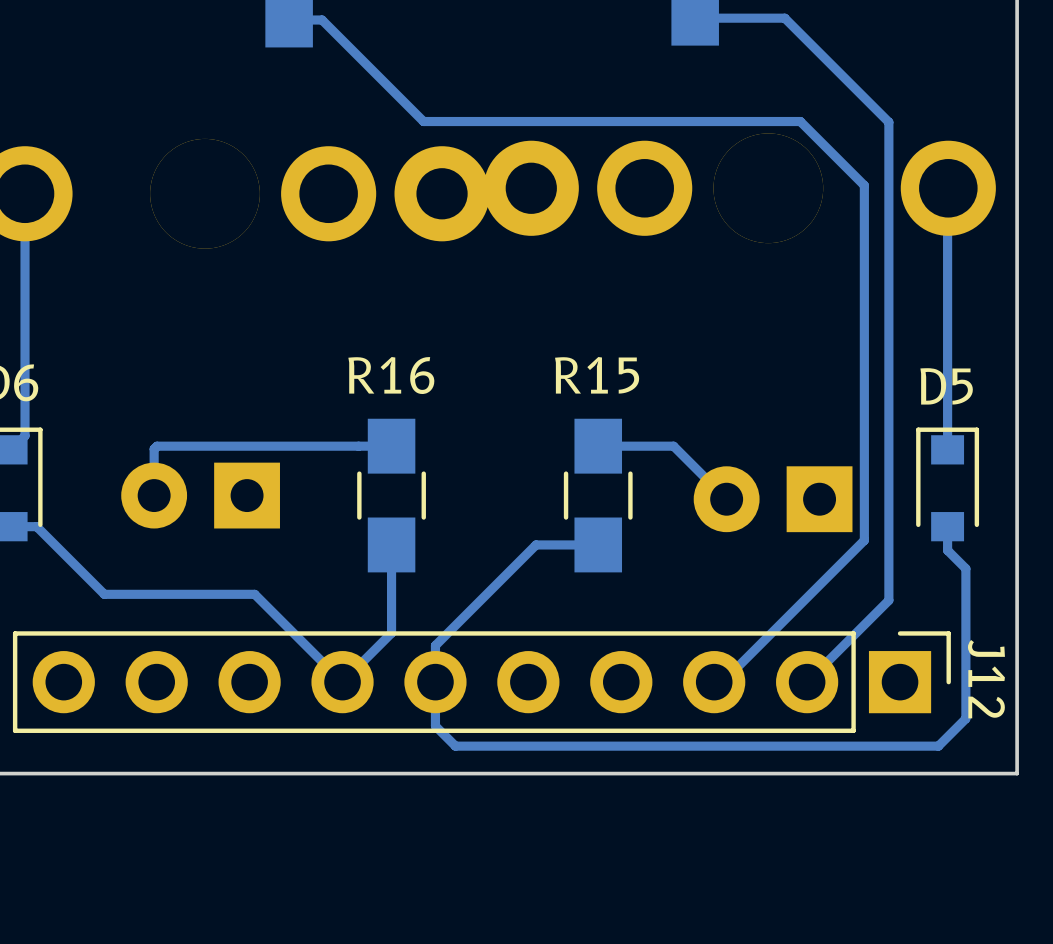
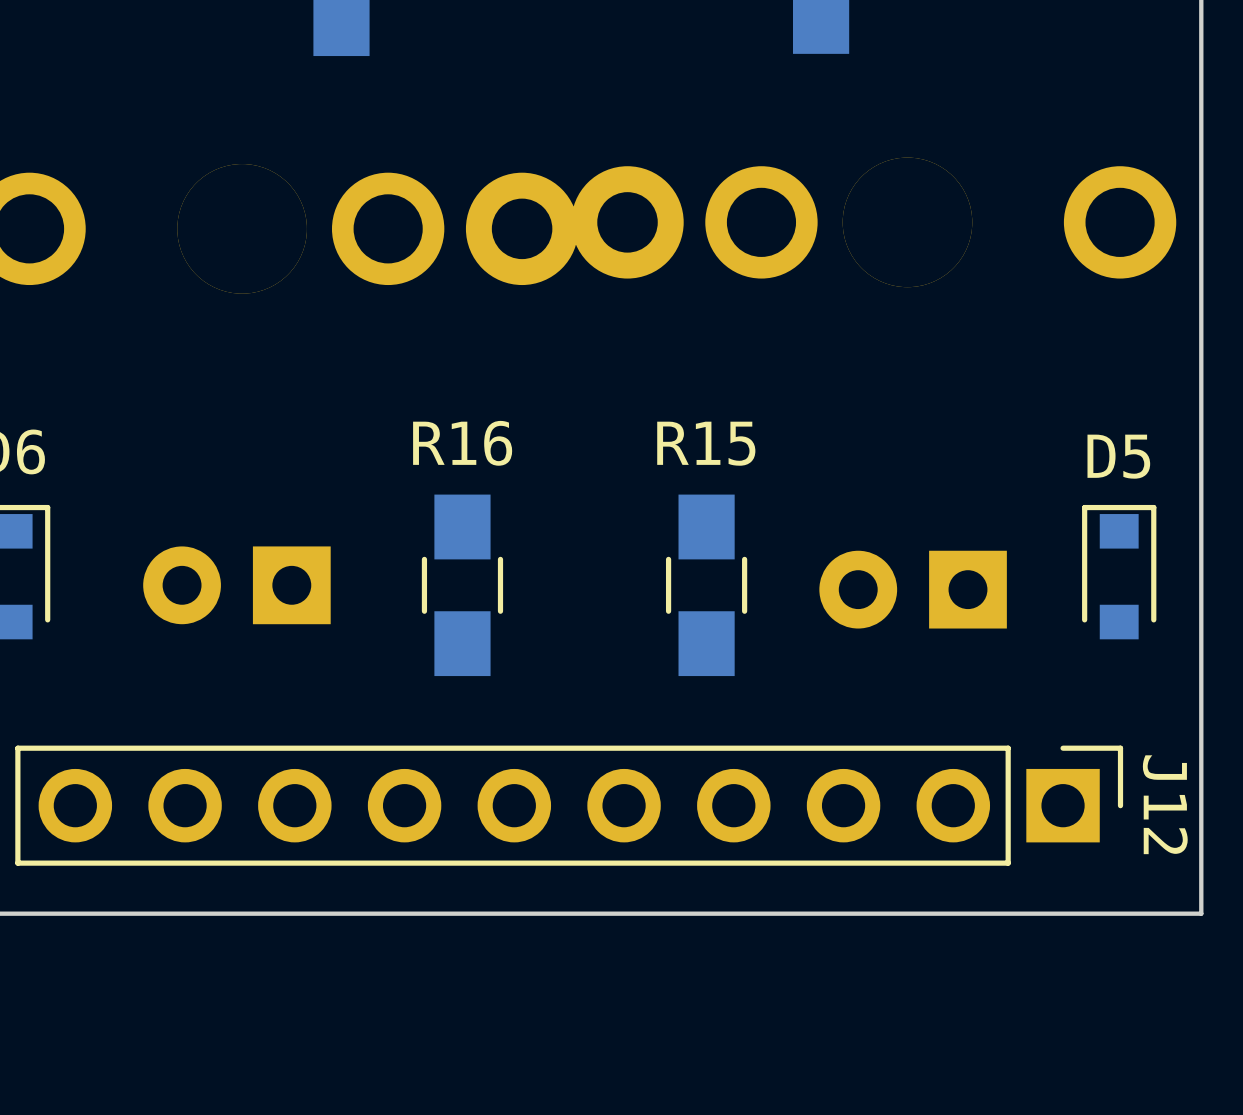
track: (695, 18) (784, 18) (888, 122) (888, 600) (807, 682) -> none
track: (289, 20) (322, 20) (423, 121) (800, 121) (864, 185) (864, 540) (722, 682) (714, 682) -> none
track: (948, 188) (947, 449) -> none
track: (25, 193) (25, 435) (11, 449) -> none
track: (391, 446) (156, 446) (154, 449) (154, 495) -> none
track: (598, 446) (673, 446) (726, 499) -> none
track: (11, 526) (36, 526) (104, 594) (254, 594) (342, 682) (391, 633) (391, 544) -> none
track: (947, 526) (947, 550) (965, 568) (965, 718) (938, 746) (455, 746) (435, 726) (435, 645) (536, 544) (598, 544) -> none

